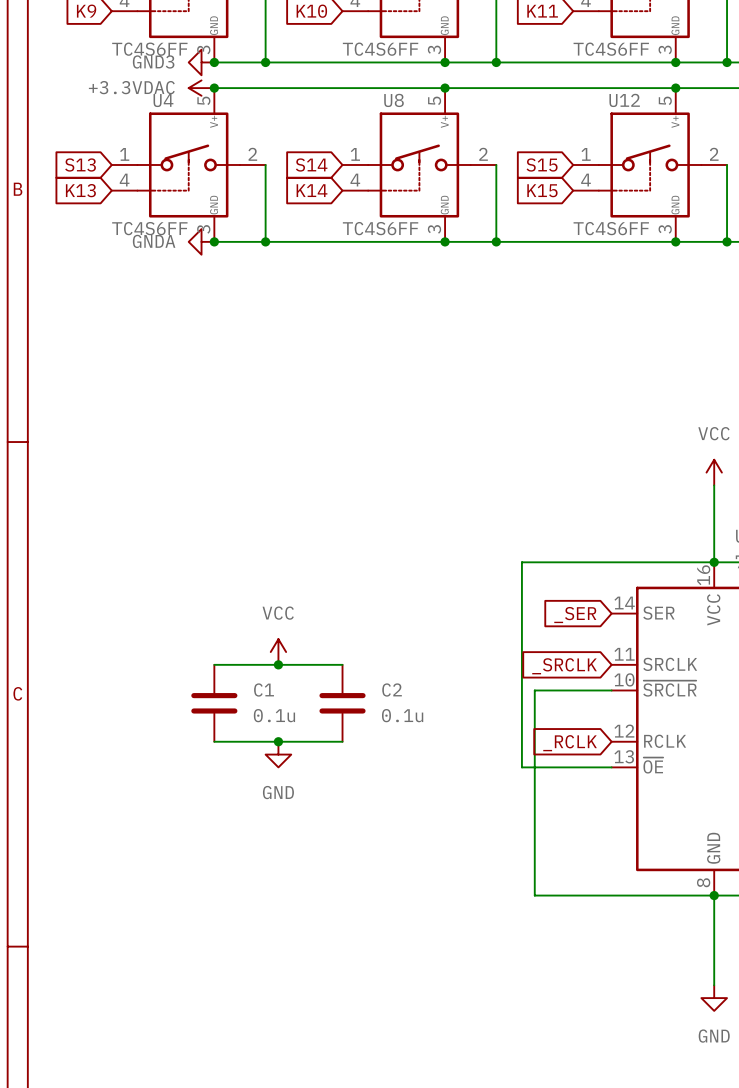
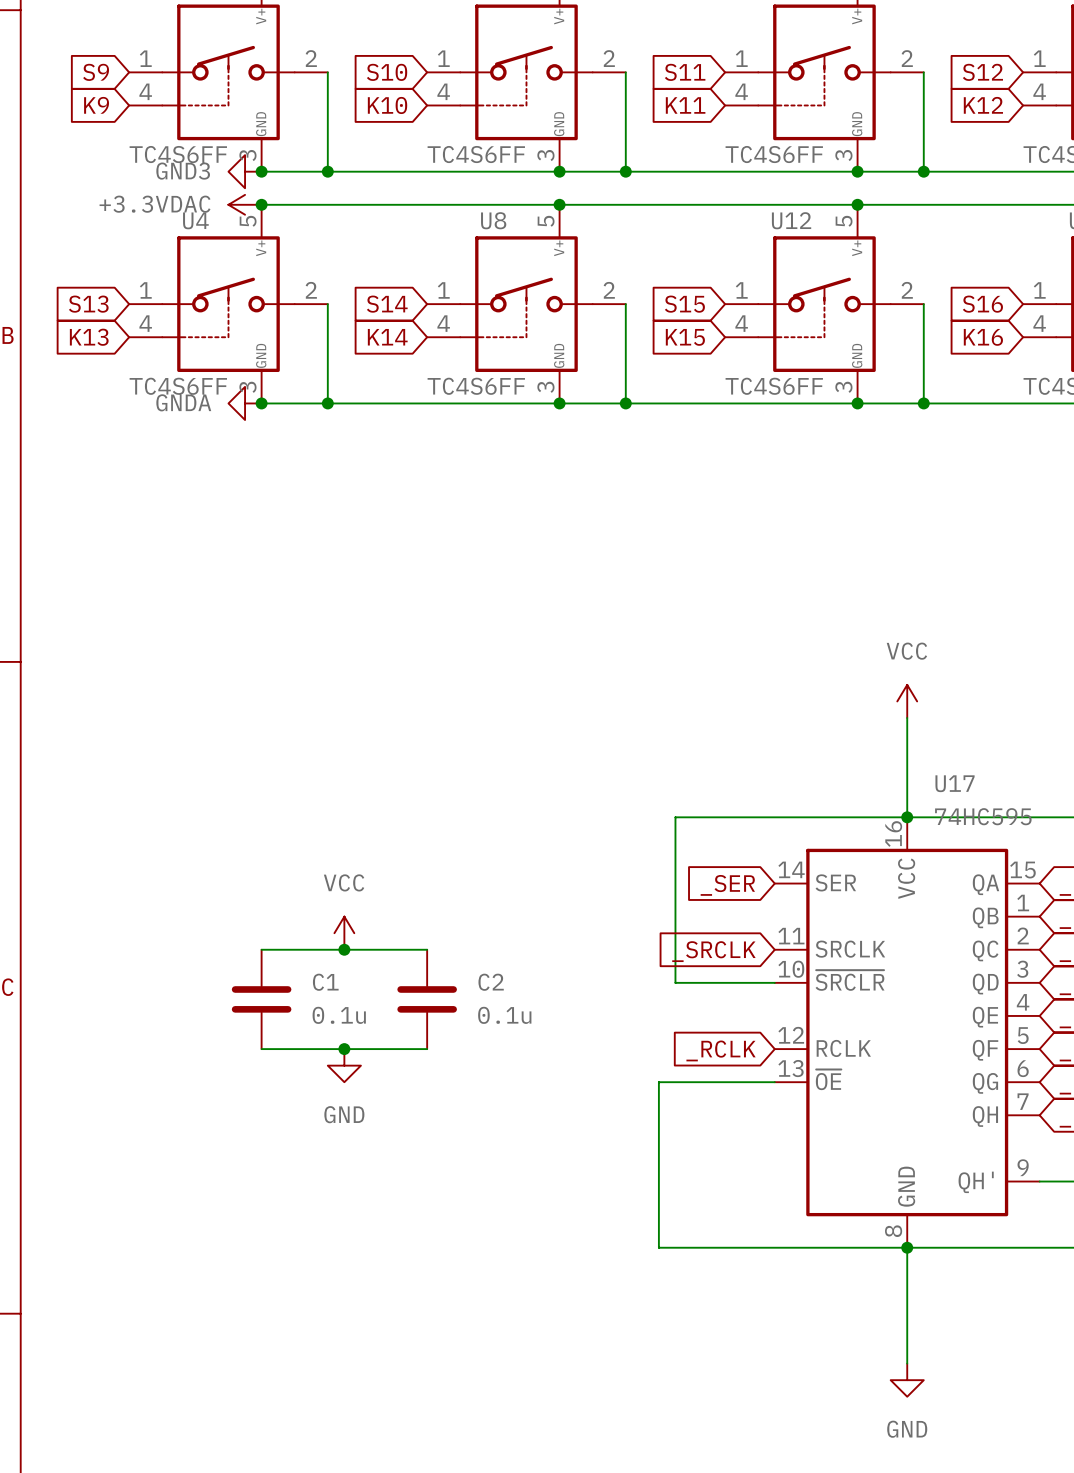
wire: (534, 562) (521, 562) (521, 767) -> (675, 817) (675, 982)
wire: (534, 690) (534, 895) -> (658, 1082) (658, 1247) (675, 1247)

